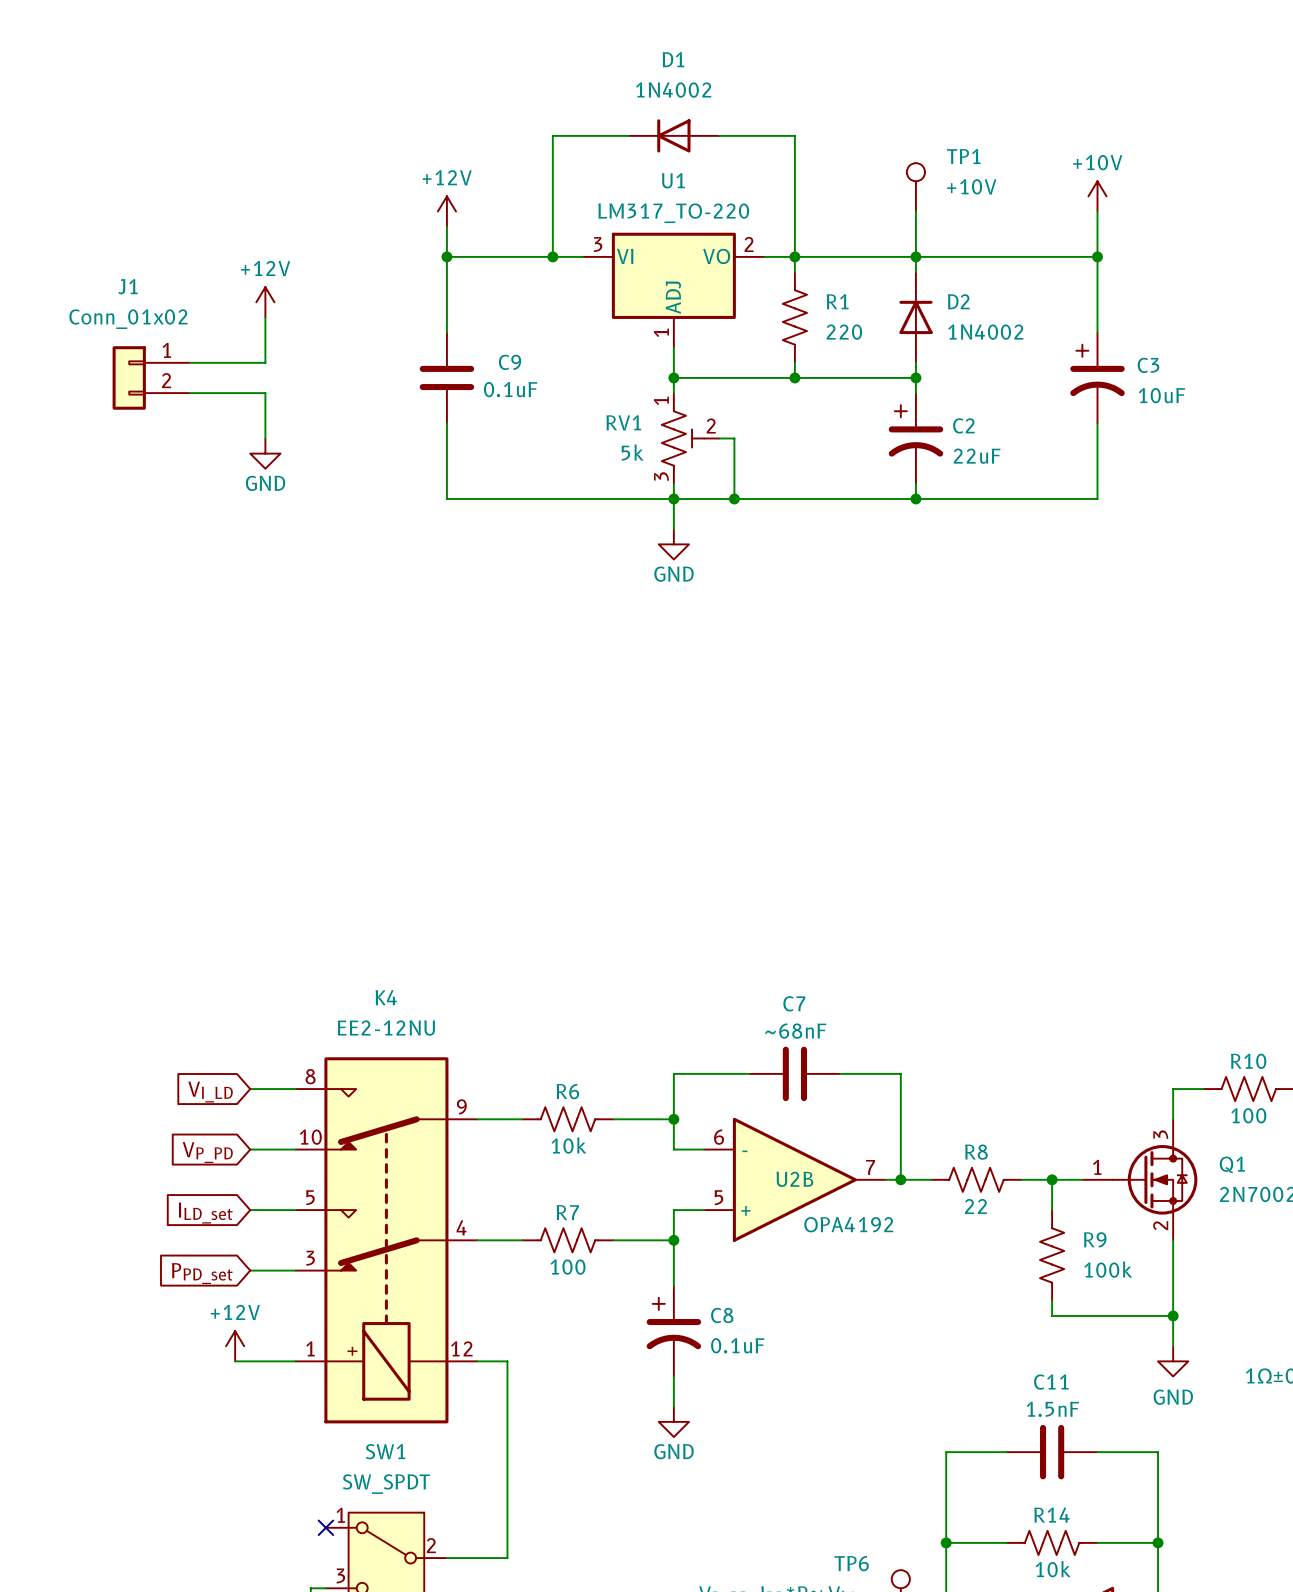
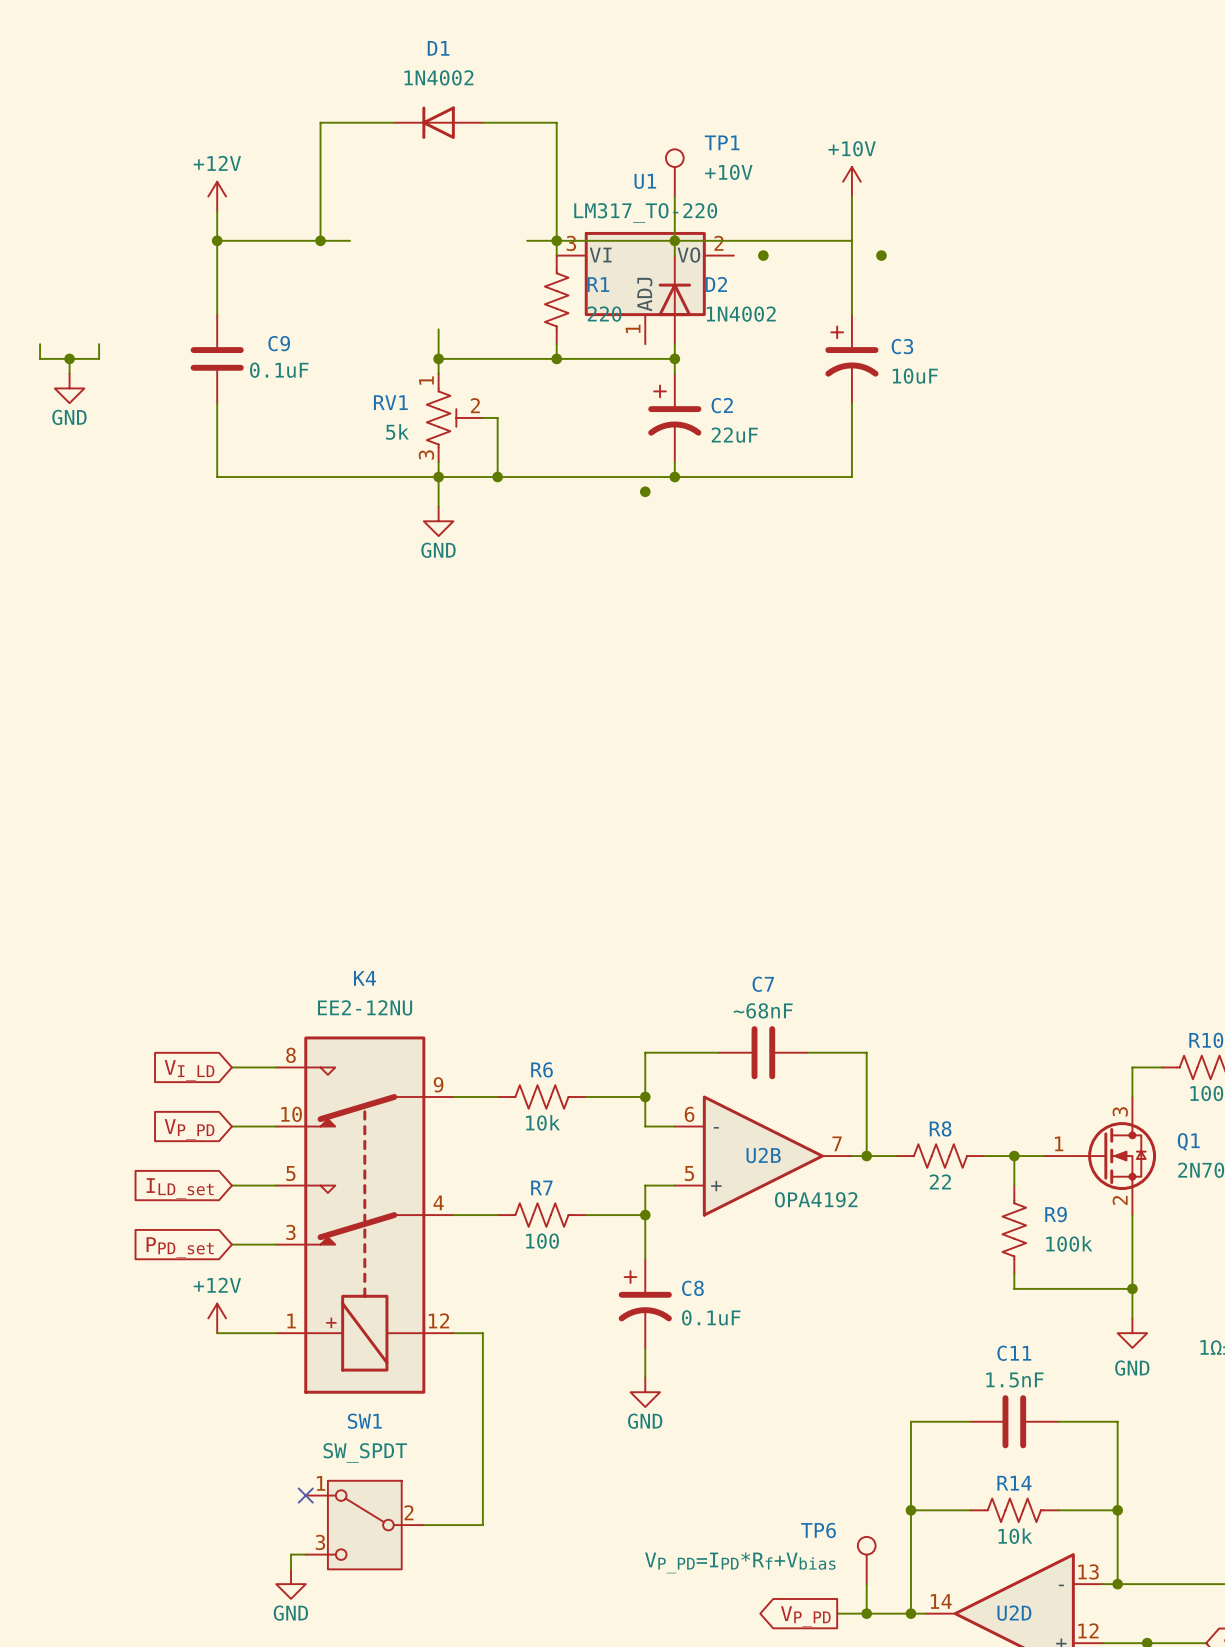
wire: (628, 135) (552, 135) (552, 256) -> (394, 122) (320, 122) (320, 240)
D1 position: (673, 135) -> (438, 122)
wire: (719, 135) (794, 135) (794, 272) -> none
TP1 position: (915, 187) -> (674, 172)
power symbol: none -> +12V (217, 196)
power symbol position: +10V (1097, 196) -> +10V (851, 181)
power symbol: +12V (446, 211) -> none
wire: (915, 211) (915, 272) -> (674, 196) (674, 255)
wire: (1097, 211) (1097, 332) -> (851, 196) (851, 314)
wire: (446, 226) (446, 332) -> (217, 211) (217, 314)
wire: none -> (217, 240) (350, 240)
junction: none -> (217, 240)
junction: none -> (320, 240)
junction: none -> (674, 240)
wire: (446, 256) (583, 256) -> (482, 122) (556, 122) (556, 255)
junction: (446, 256) -> none
junction position: (552, 256) -> (556, 240)
wire: (764, 256) (1097, 256) -> (527, 240) (851, 240)
junction: (1097, 256) -> none
power symbol: +12V (265, 302) -> none
wire: (265, 317) (265, 362) (189, 362) -> none
R1 position: (794, 317) -> (556, 299)
D2 position: (915, 317) -> (674, 299)
wire: none -> (40, 344) (40, 358) (99, 358) (99, 344)
wire: (673, 347) (673, 393) -> (438, 329) (438, 373)
wire: none -> (69, 358) (69, 373)
junction: none -> (69, 358)
junction: none -> (438, 358)
junction: none -> (556, 358)
wire: (794, 362) (794, 377) -> (556, 344) (556, 358)
wire: (915, 362) (915, 393) -> (674, 344) (674, 373)
J1: Conn_01x02 (151, 377) -> none
C9 position: (446, 377) -> (217, 358)
wire: (673, 377) (915, 377) -> (438, 358) (674, 358)
junction position: (673, 377) -> (674, 358)
junction: (794, 377) -> none
junction: (915, 377) -> none
C3 position: (1097, 377) -> (851, 358)
power symbol: none -> GND (69, 388)
wire: (189, 393) (265, 393) (265, 438) -> none
wire: (446, 423) (446, 499) (1097, 499) (1097, 423) -> (217, 403) (217, 477) (851, 477) (851, 403)
RV1 position: (690, 438) -> (454, 417)
wire: (719, 438) (734, 438) (734, 499) -> (482, 417) (497, 417) (497, 477)
C2 position: (915, 438) -> (674, 417)
power symbol: GND (265, 453) -> none
junction: none -> (438, 477)
junction: none -> (497, 477)
wire: (673, 483) (673, 529) -> (438, 462) (438, 506)
wire: (915, 483) (915, 499) -> (674, 462) (674, 477)
junction position: (734, 499) -> (674, 477)
junction: (915, 499) -> none
power symbol: none -> GND (438, 521)
power symbol: GND (673, 544) -> none

